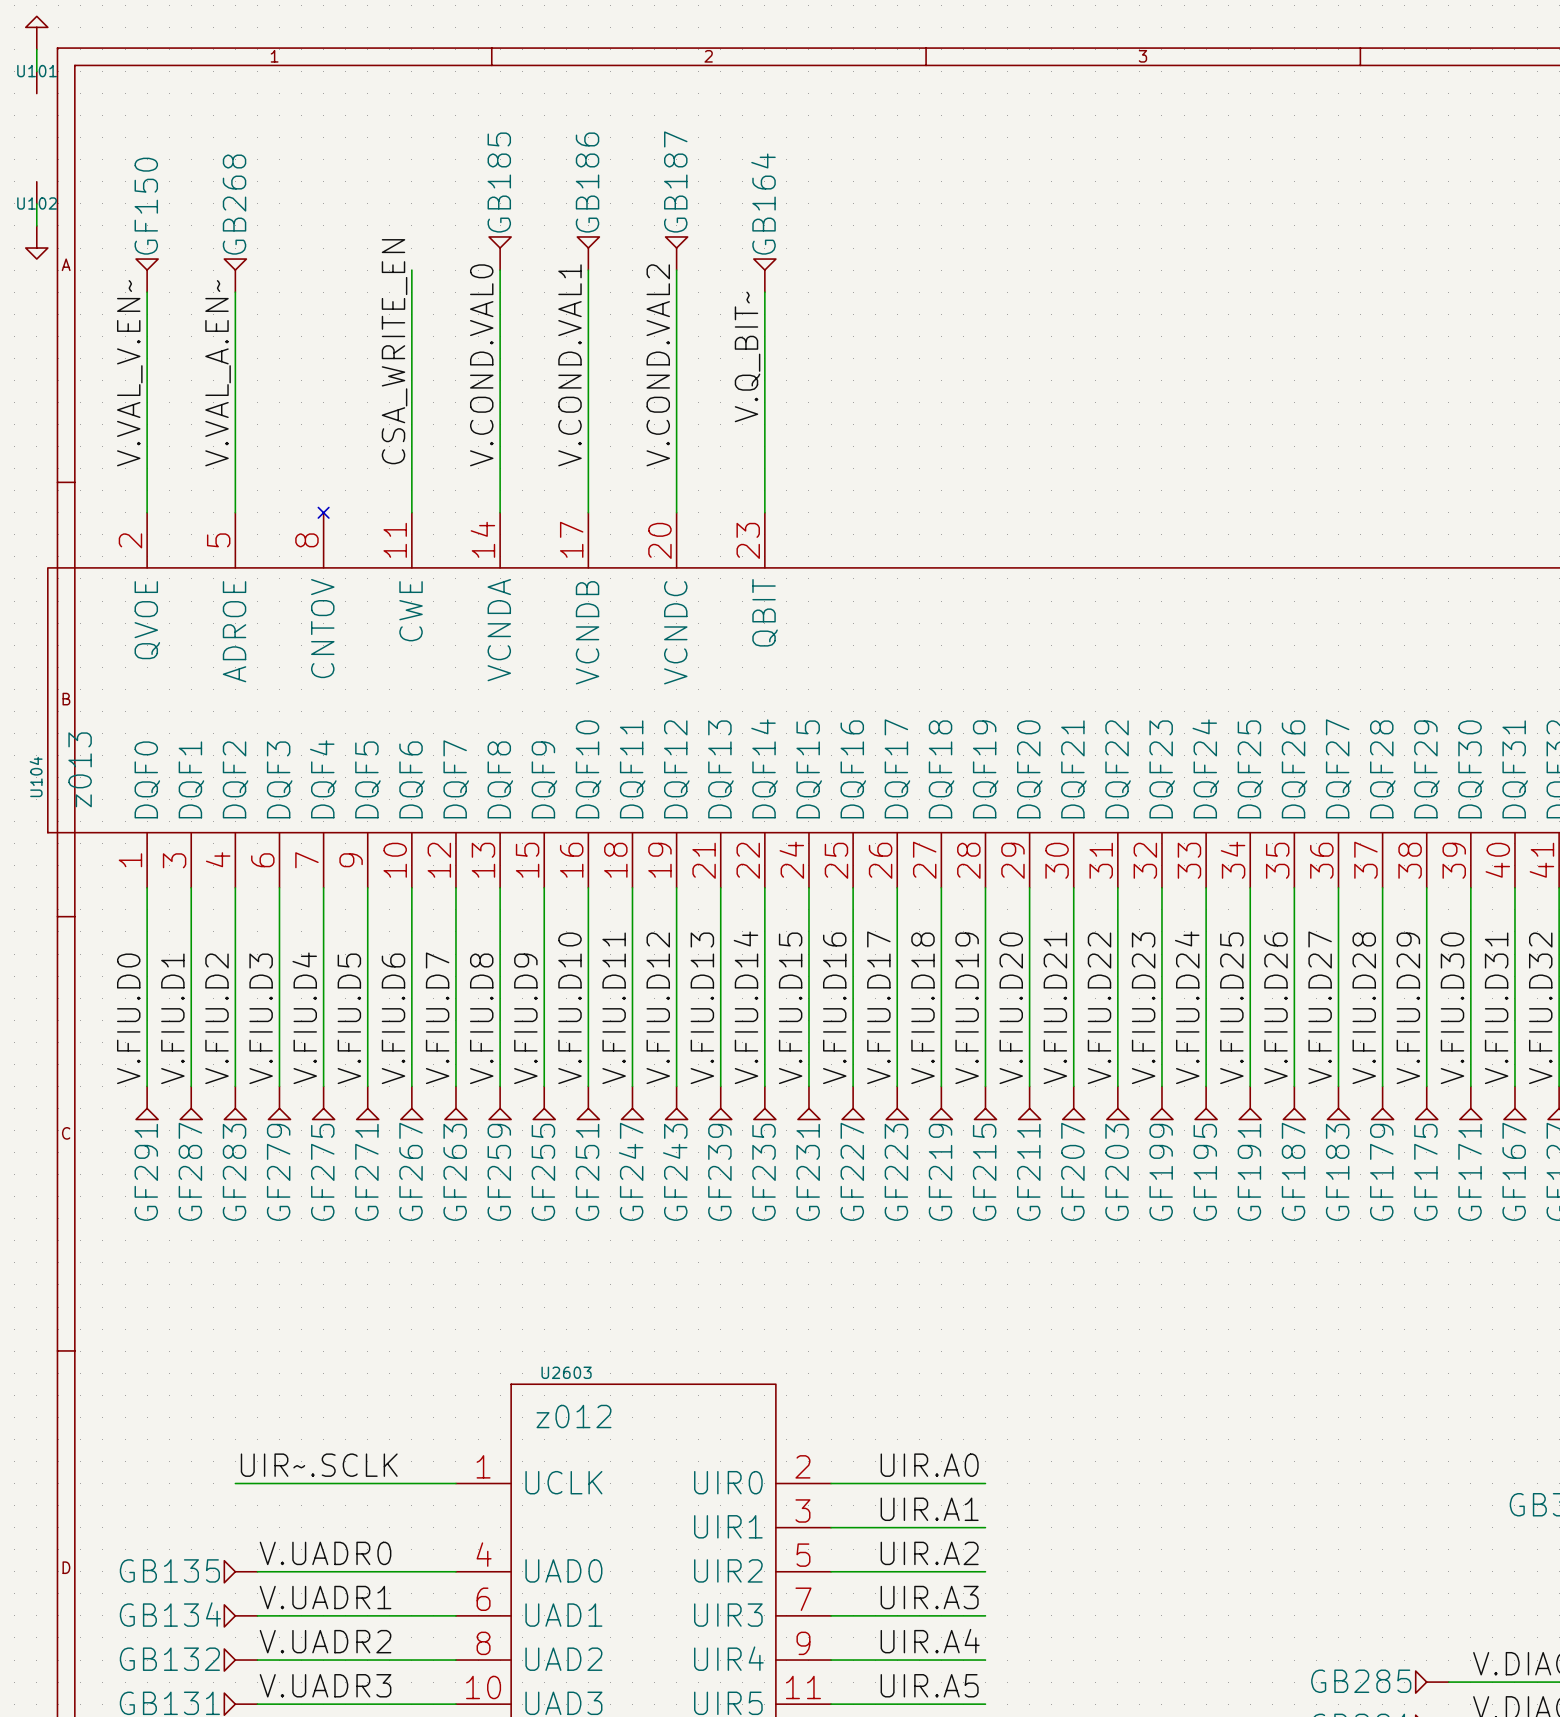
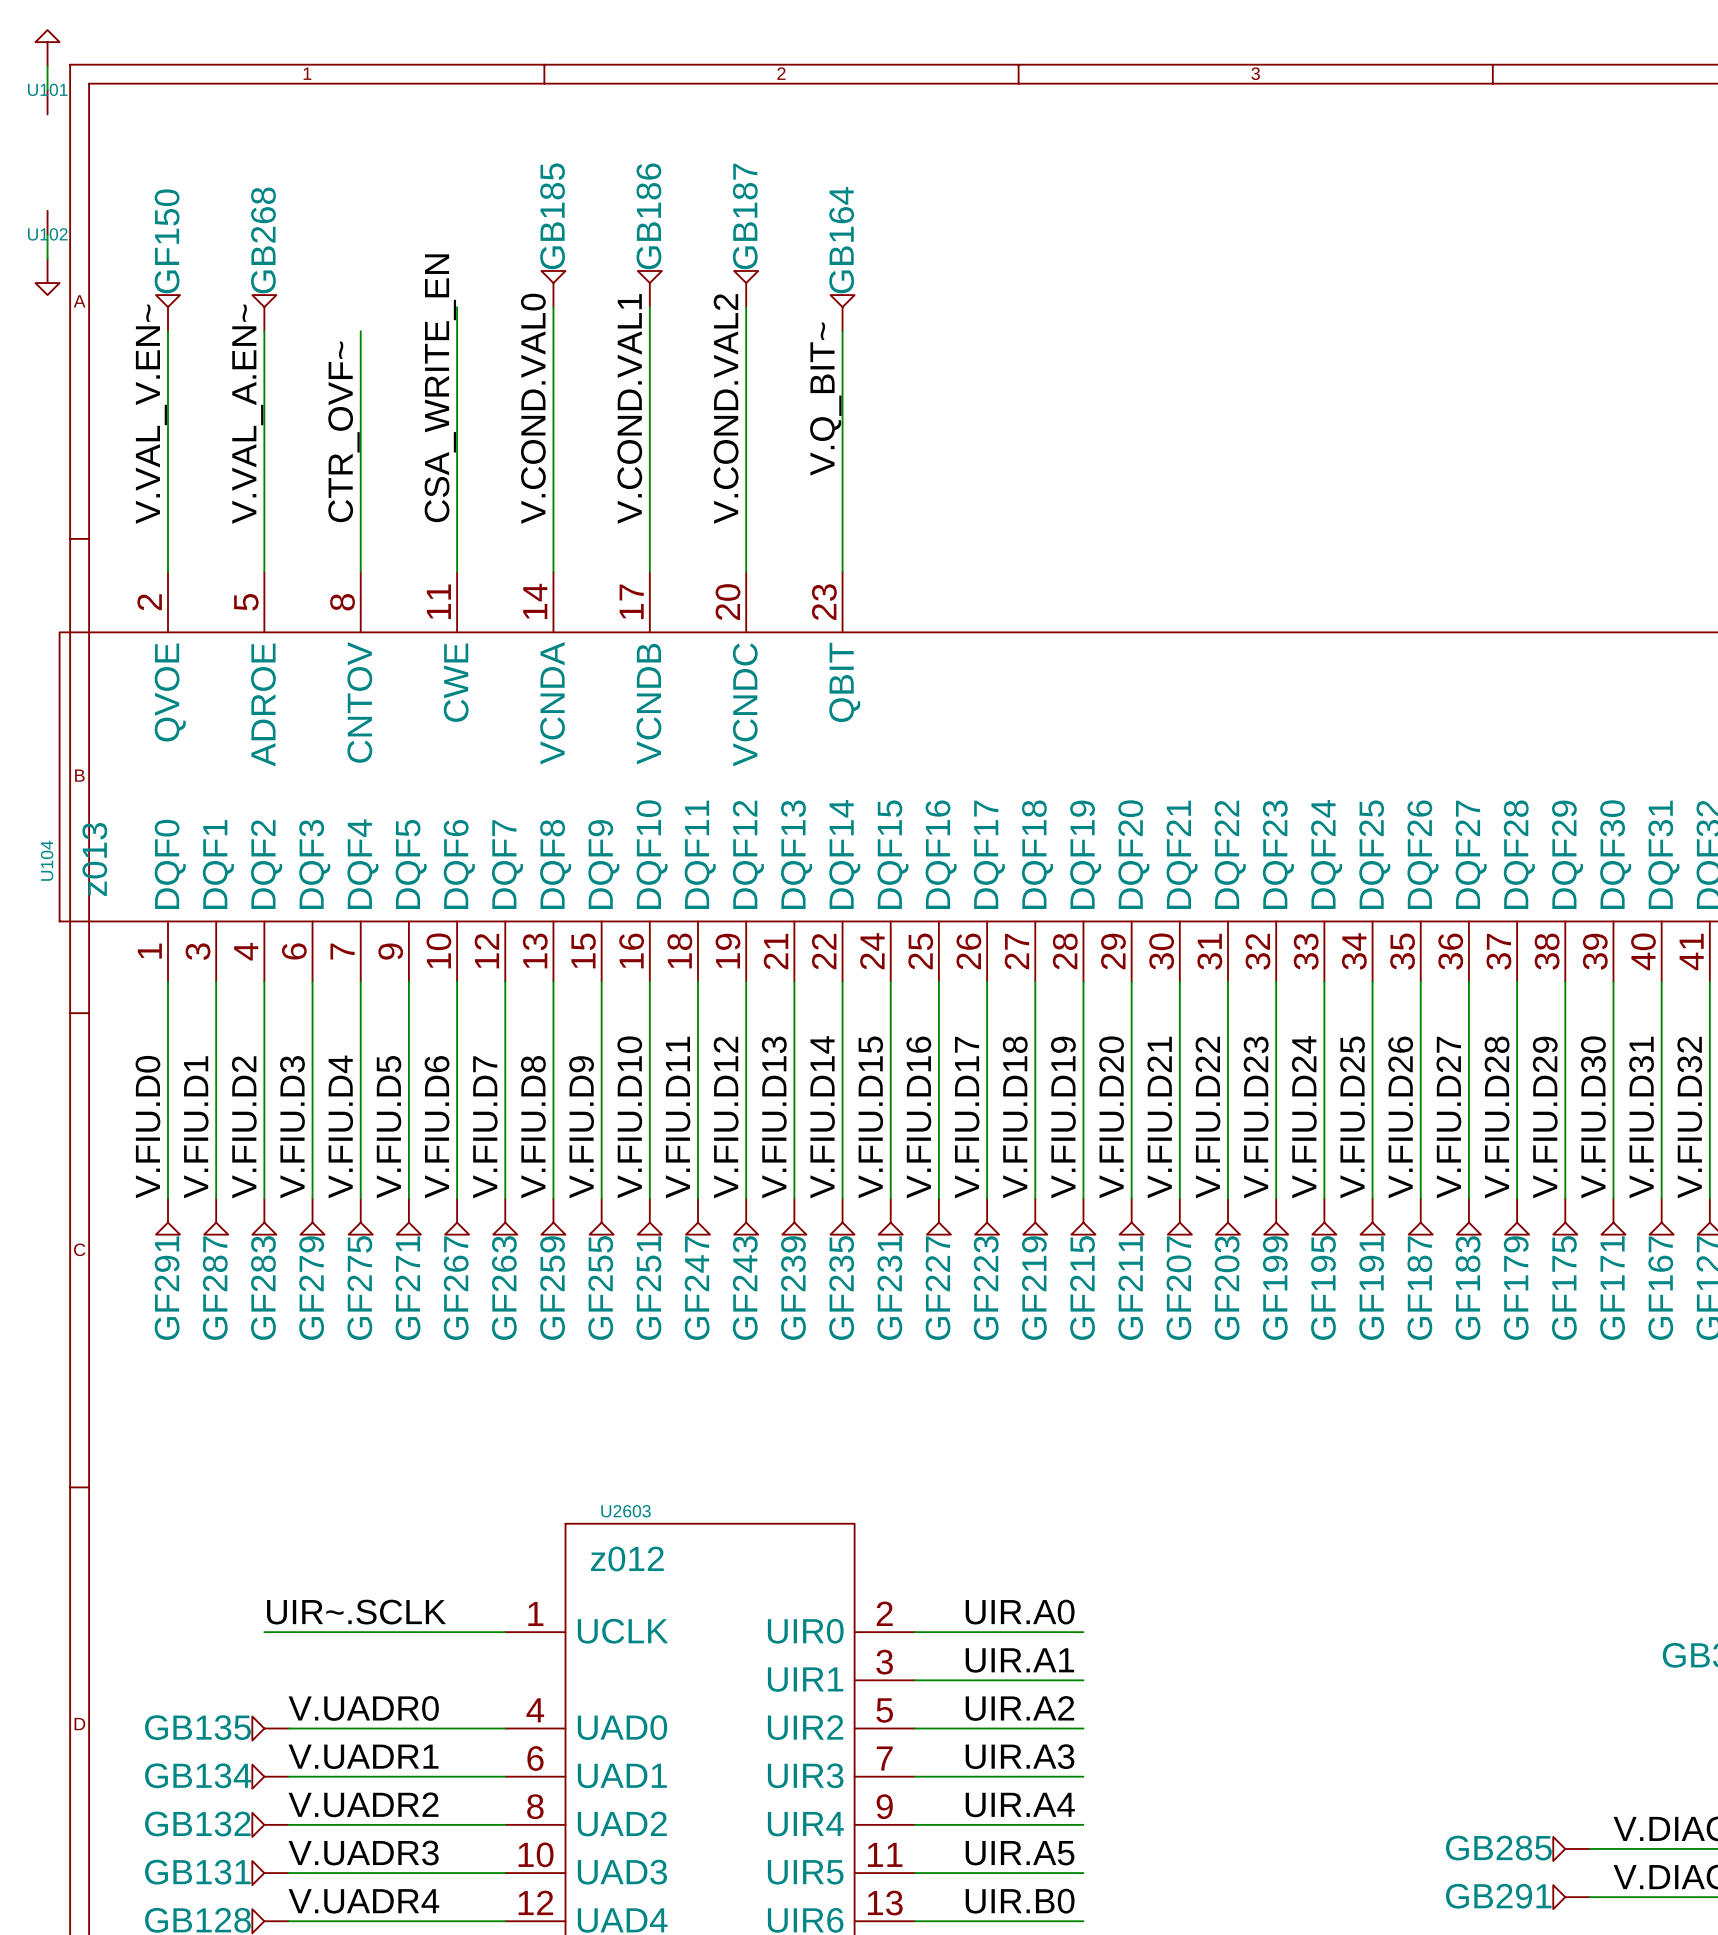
wire: none -> (360, 331) (360, 572)
label: none -> CTR_OVF~ (343, 431)
no-connect mark: (323, 512) -> none

